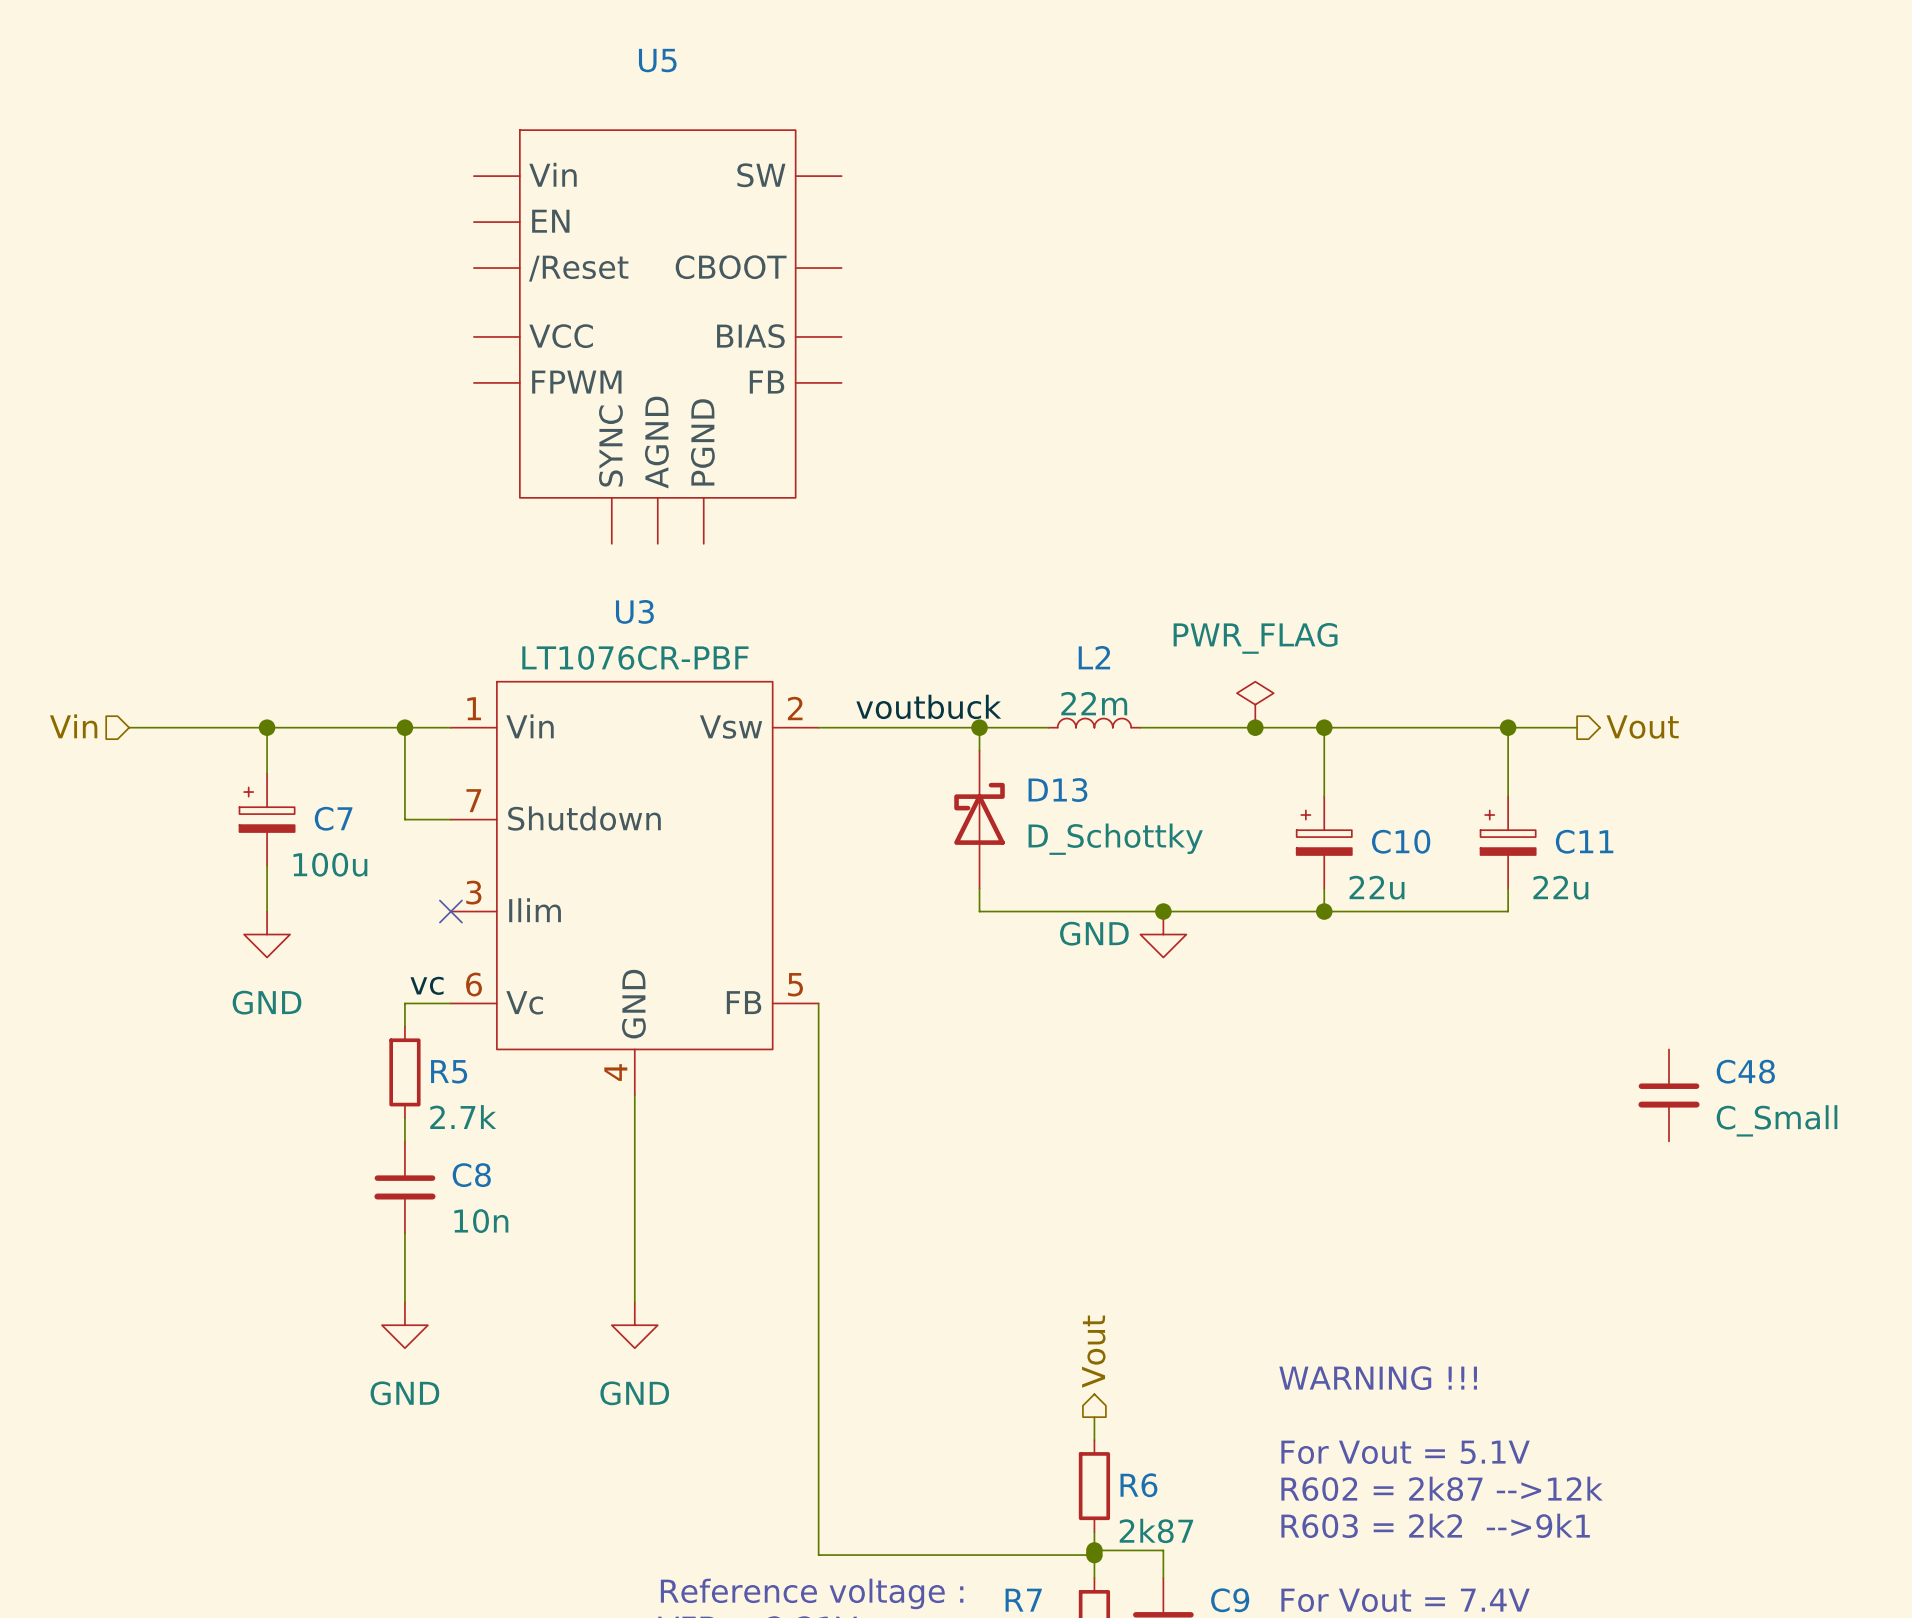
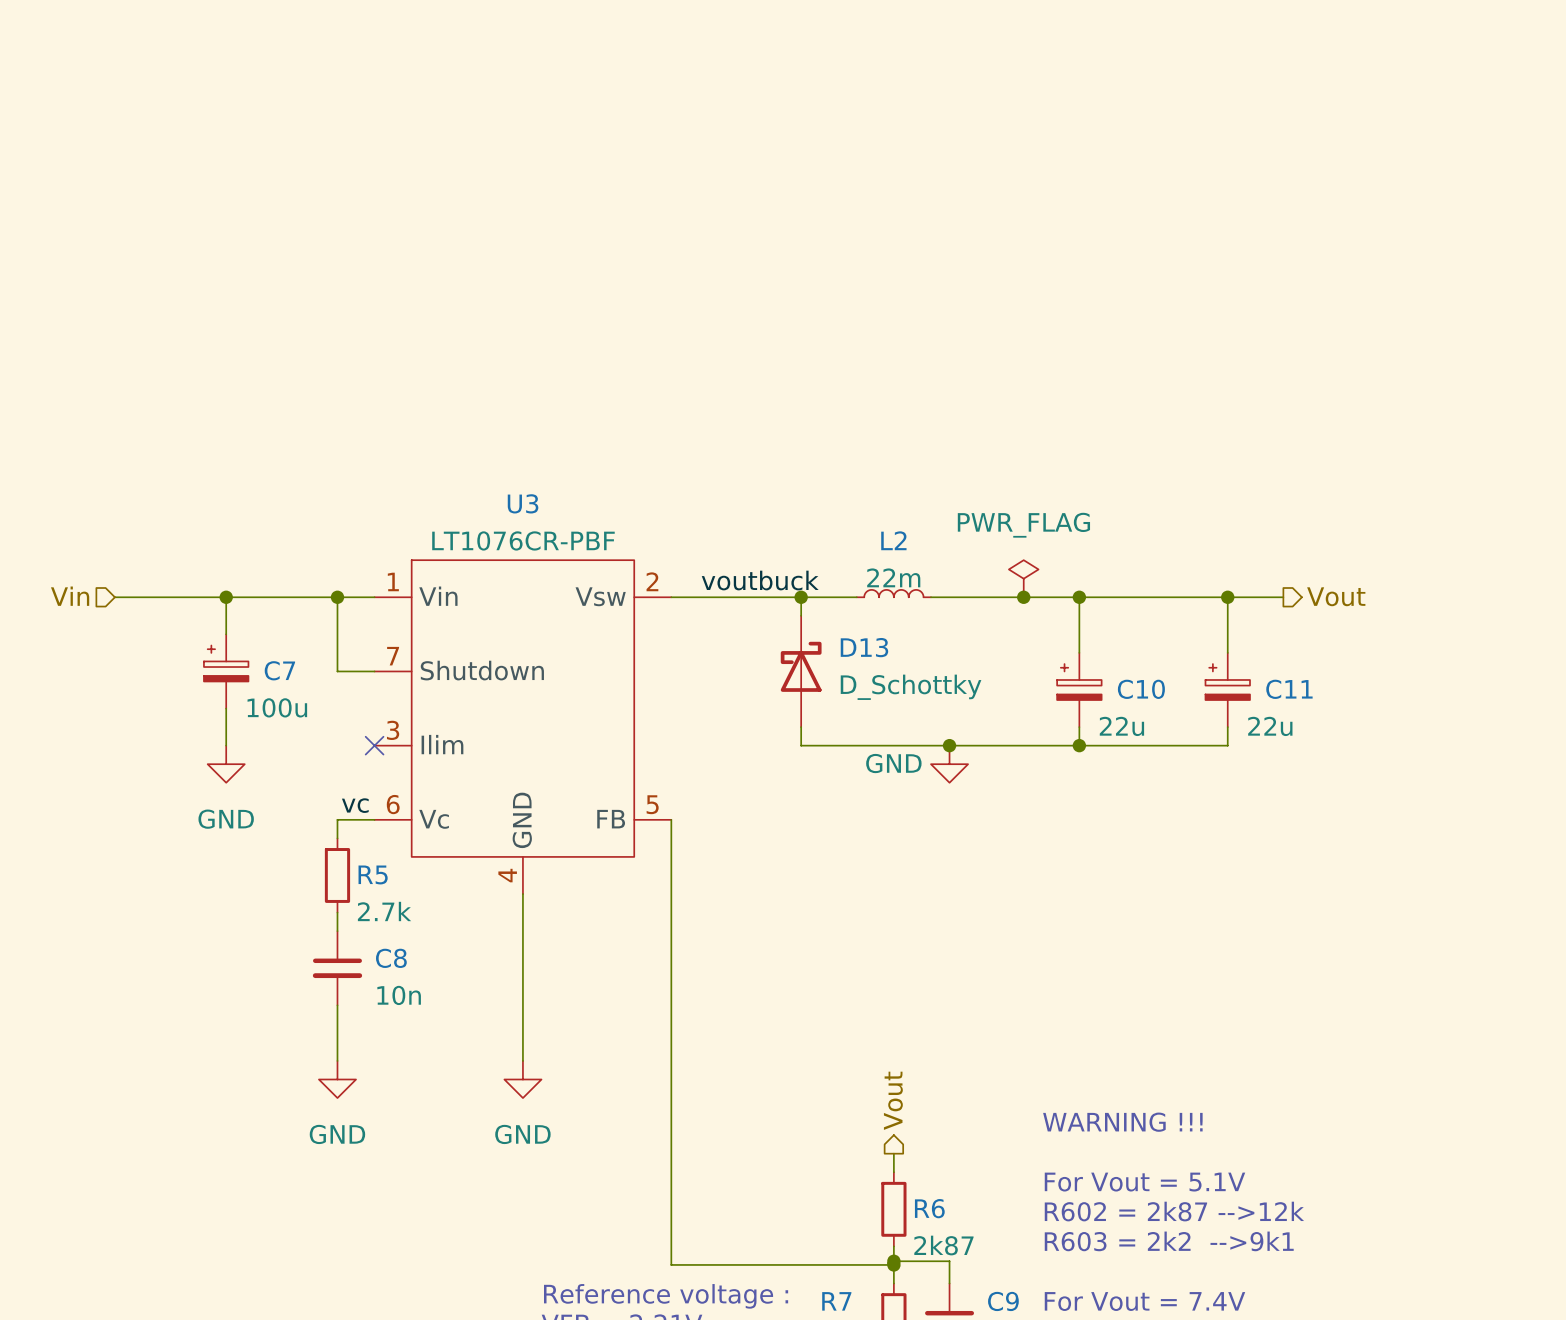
U5: (657, 336) -> none
C48: C_Small (1668, 1095) -> none

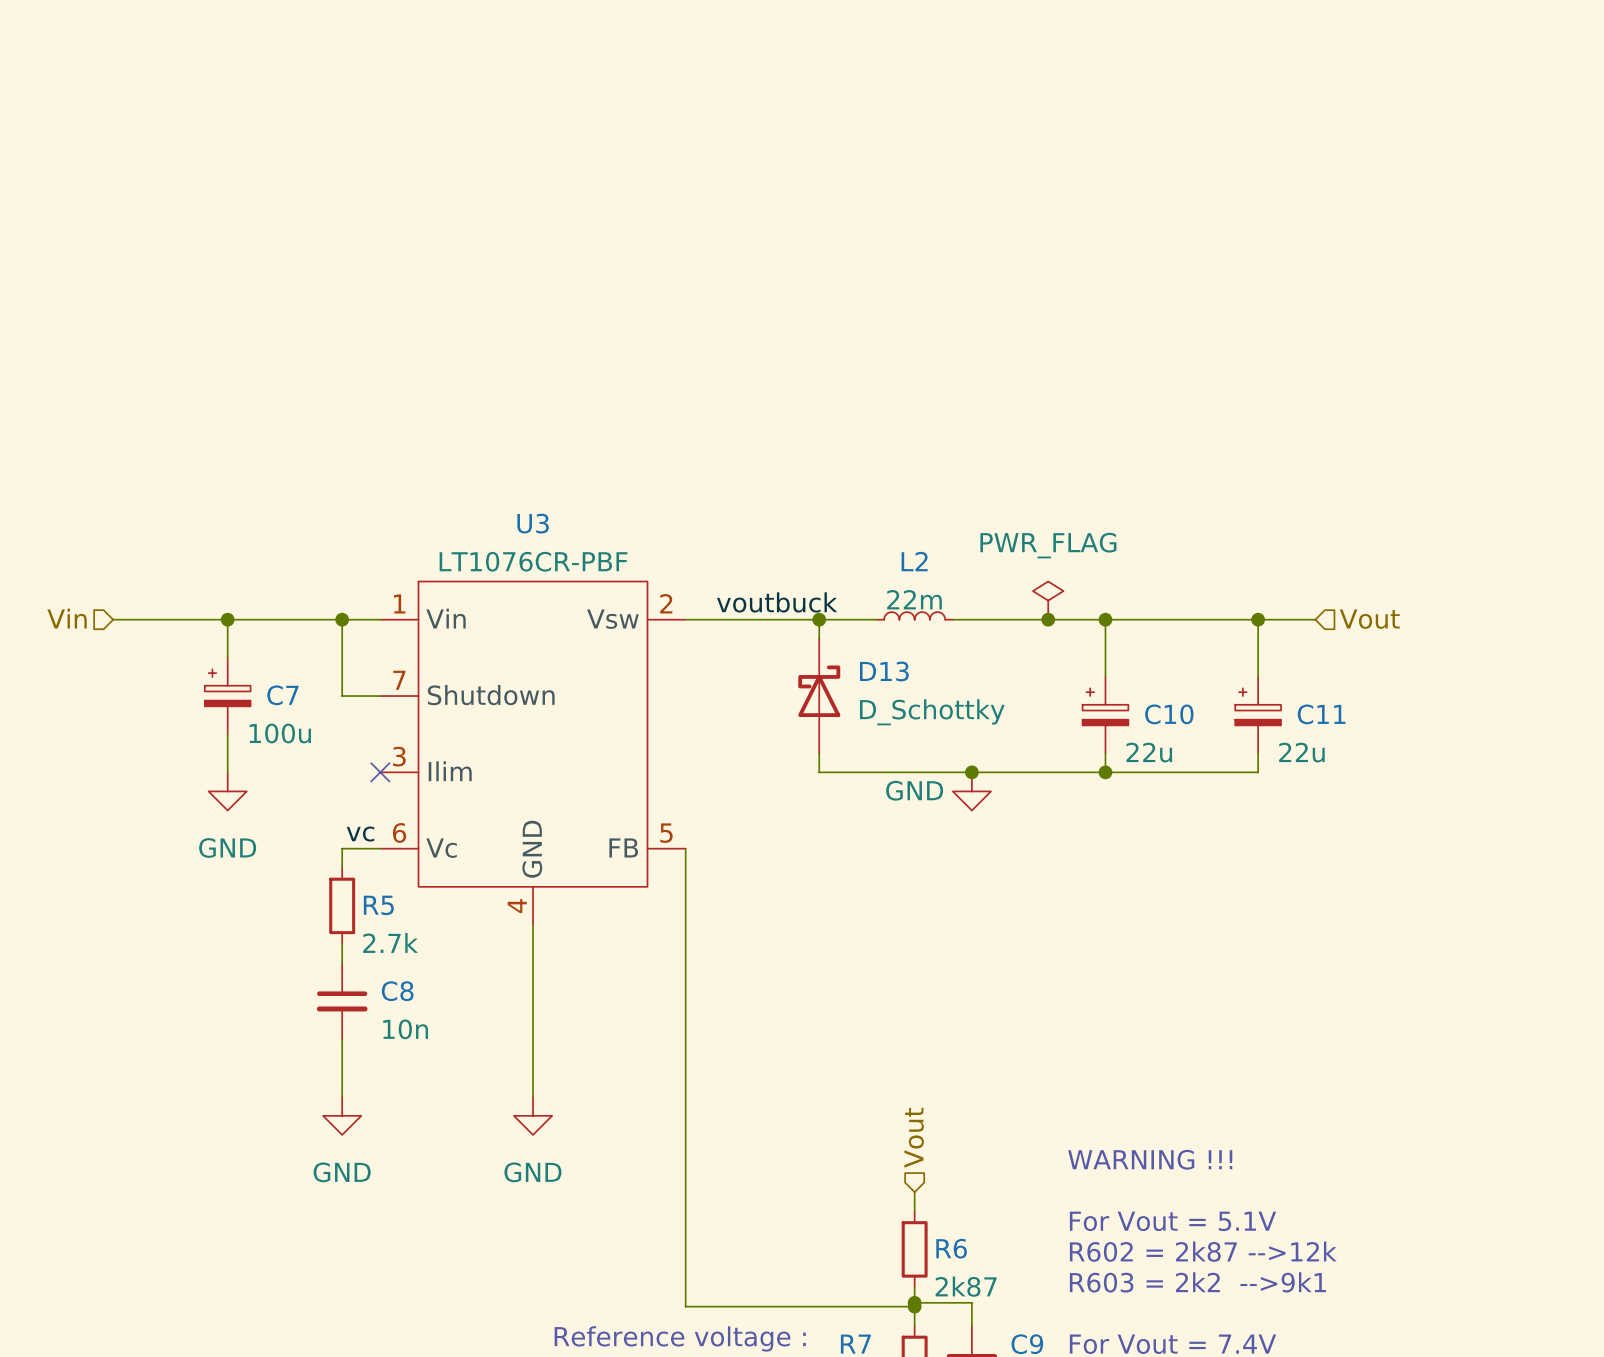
hierarchical label shape: output (1336, 596) -> input (1369, 619)
hierarchical label shape: output (893, 1100) -> input (914, 1137)

